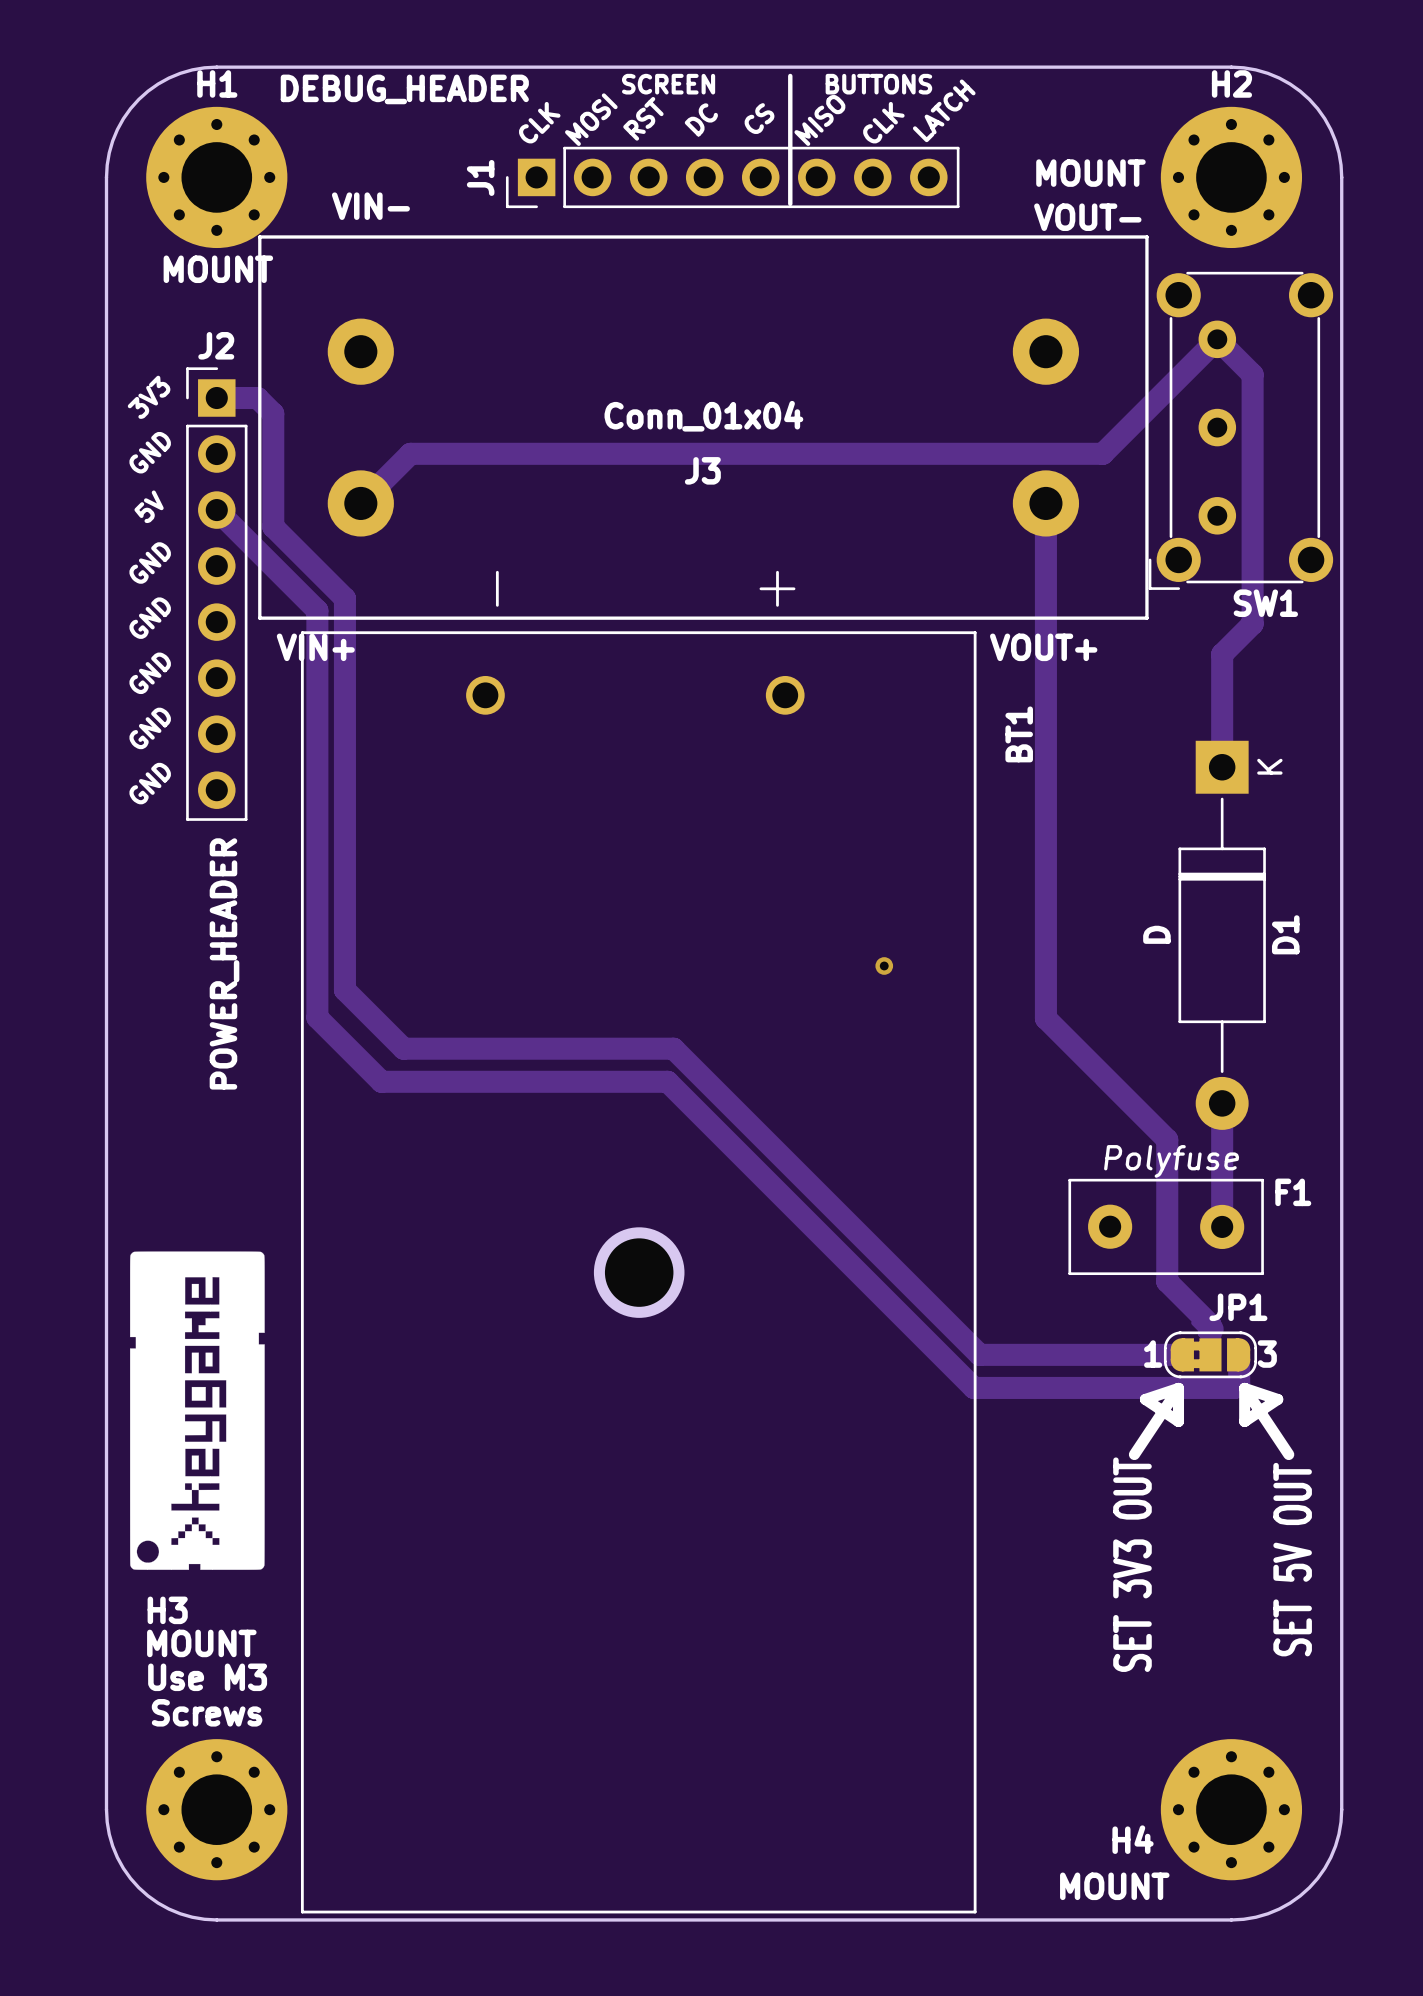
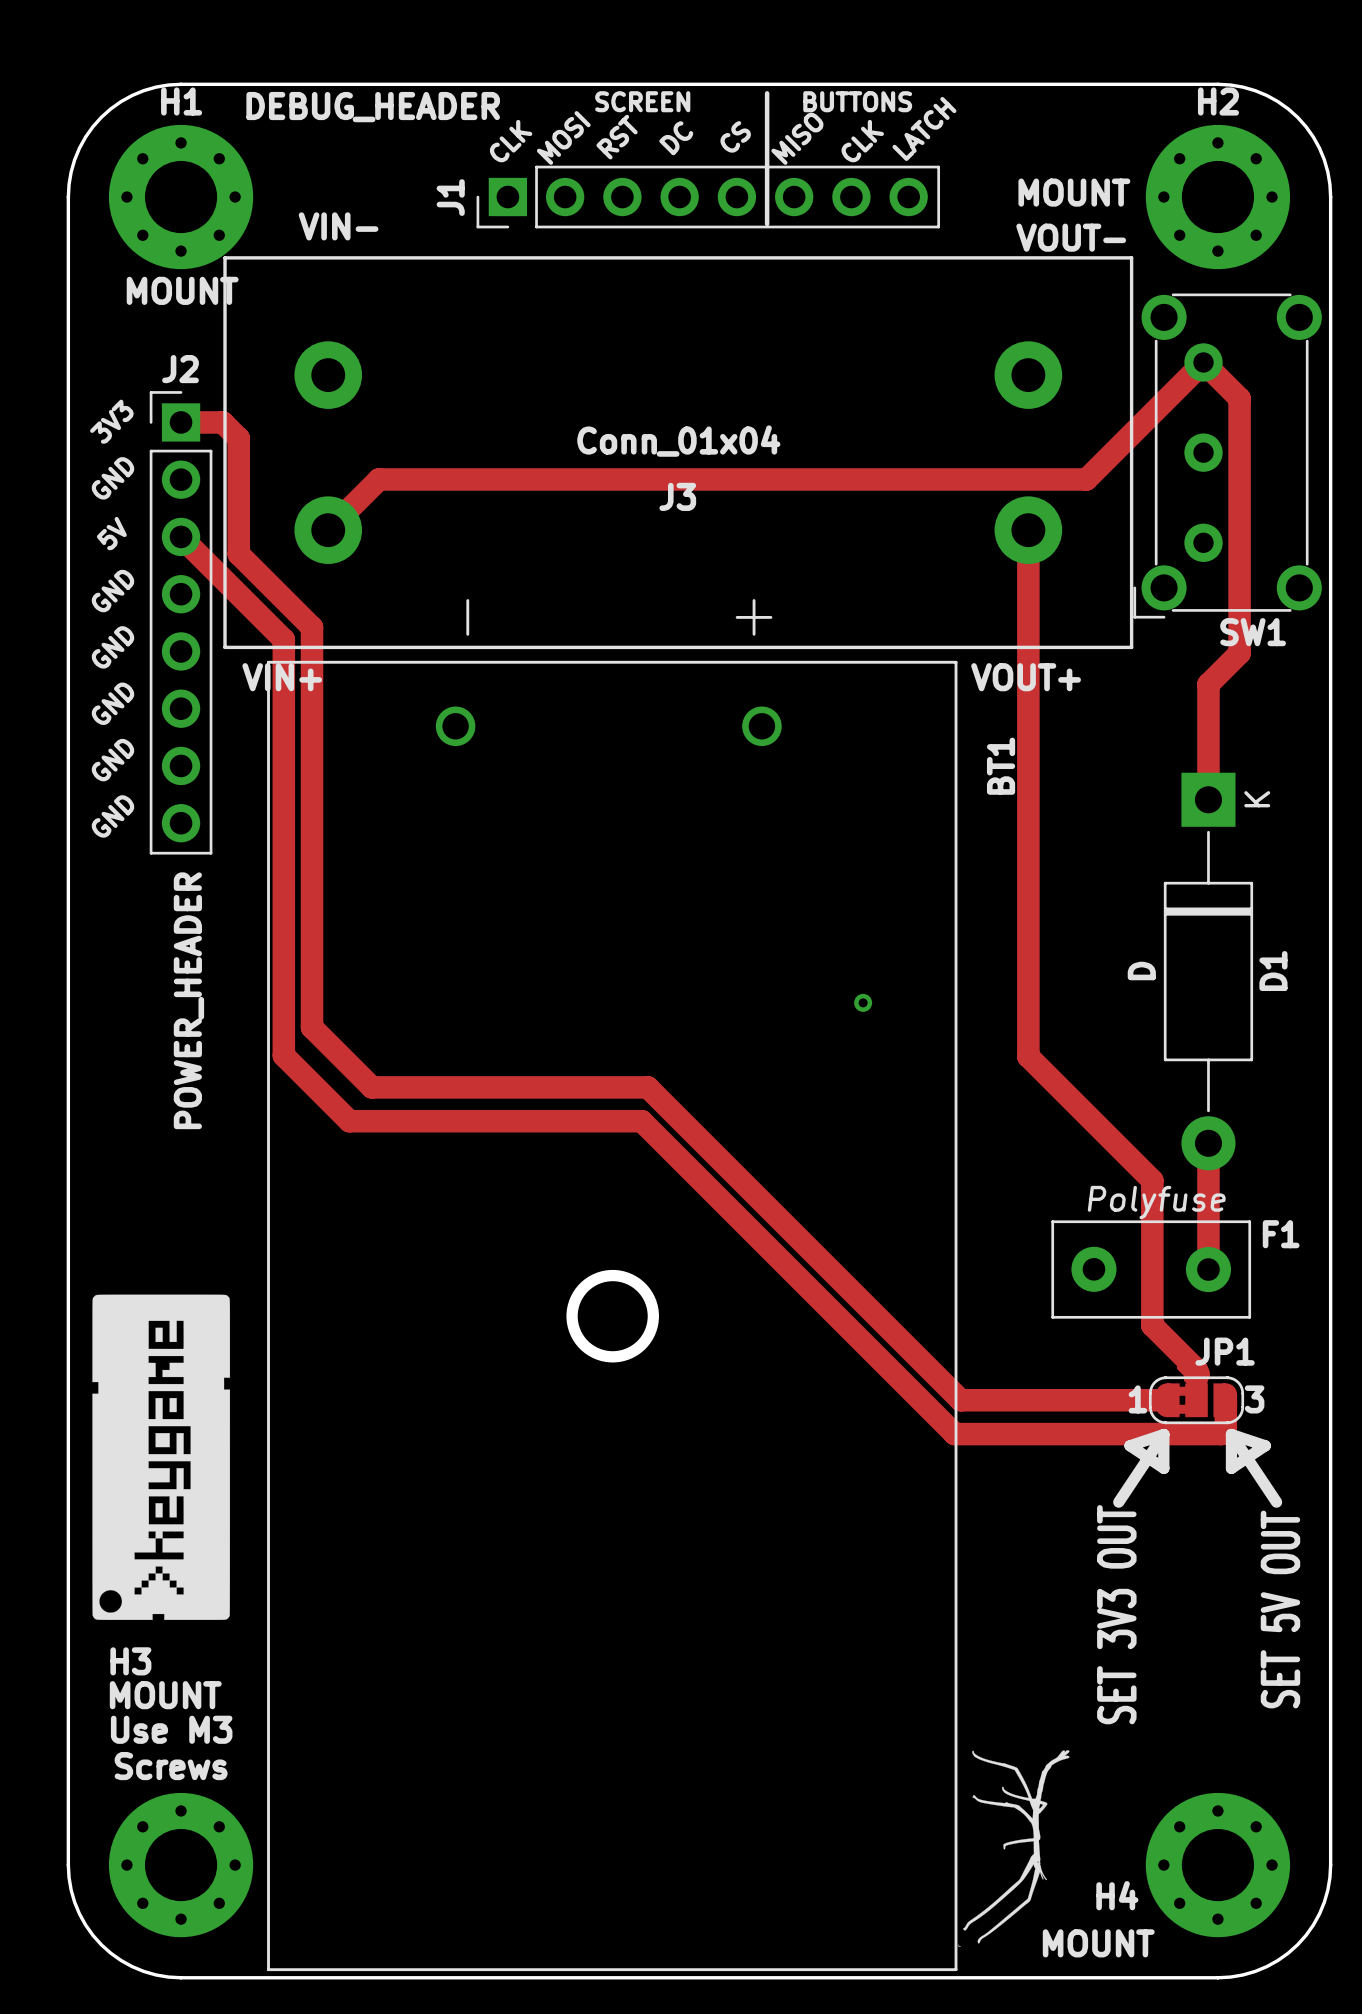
drawing: none -> [958, 1750, 1070, 1947]

